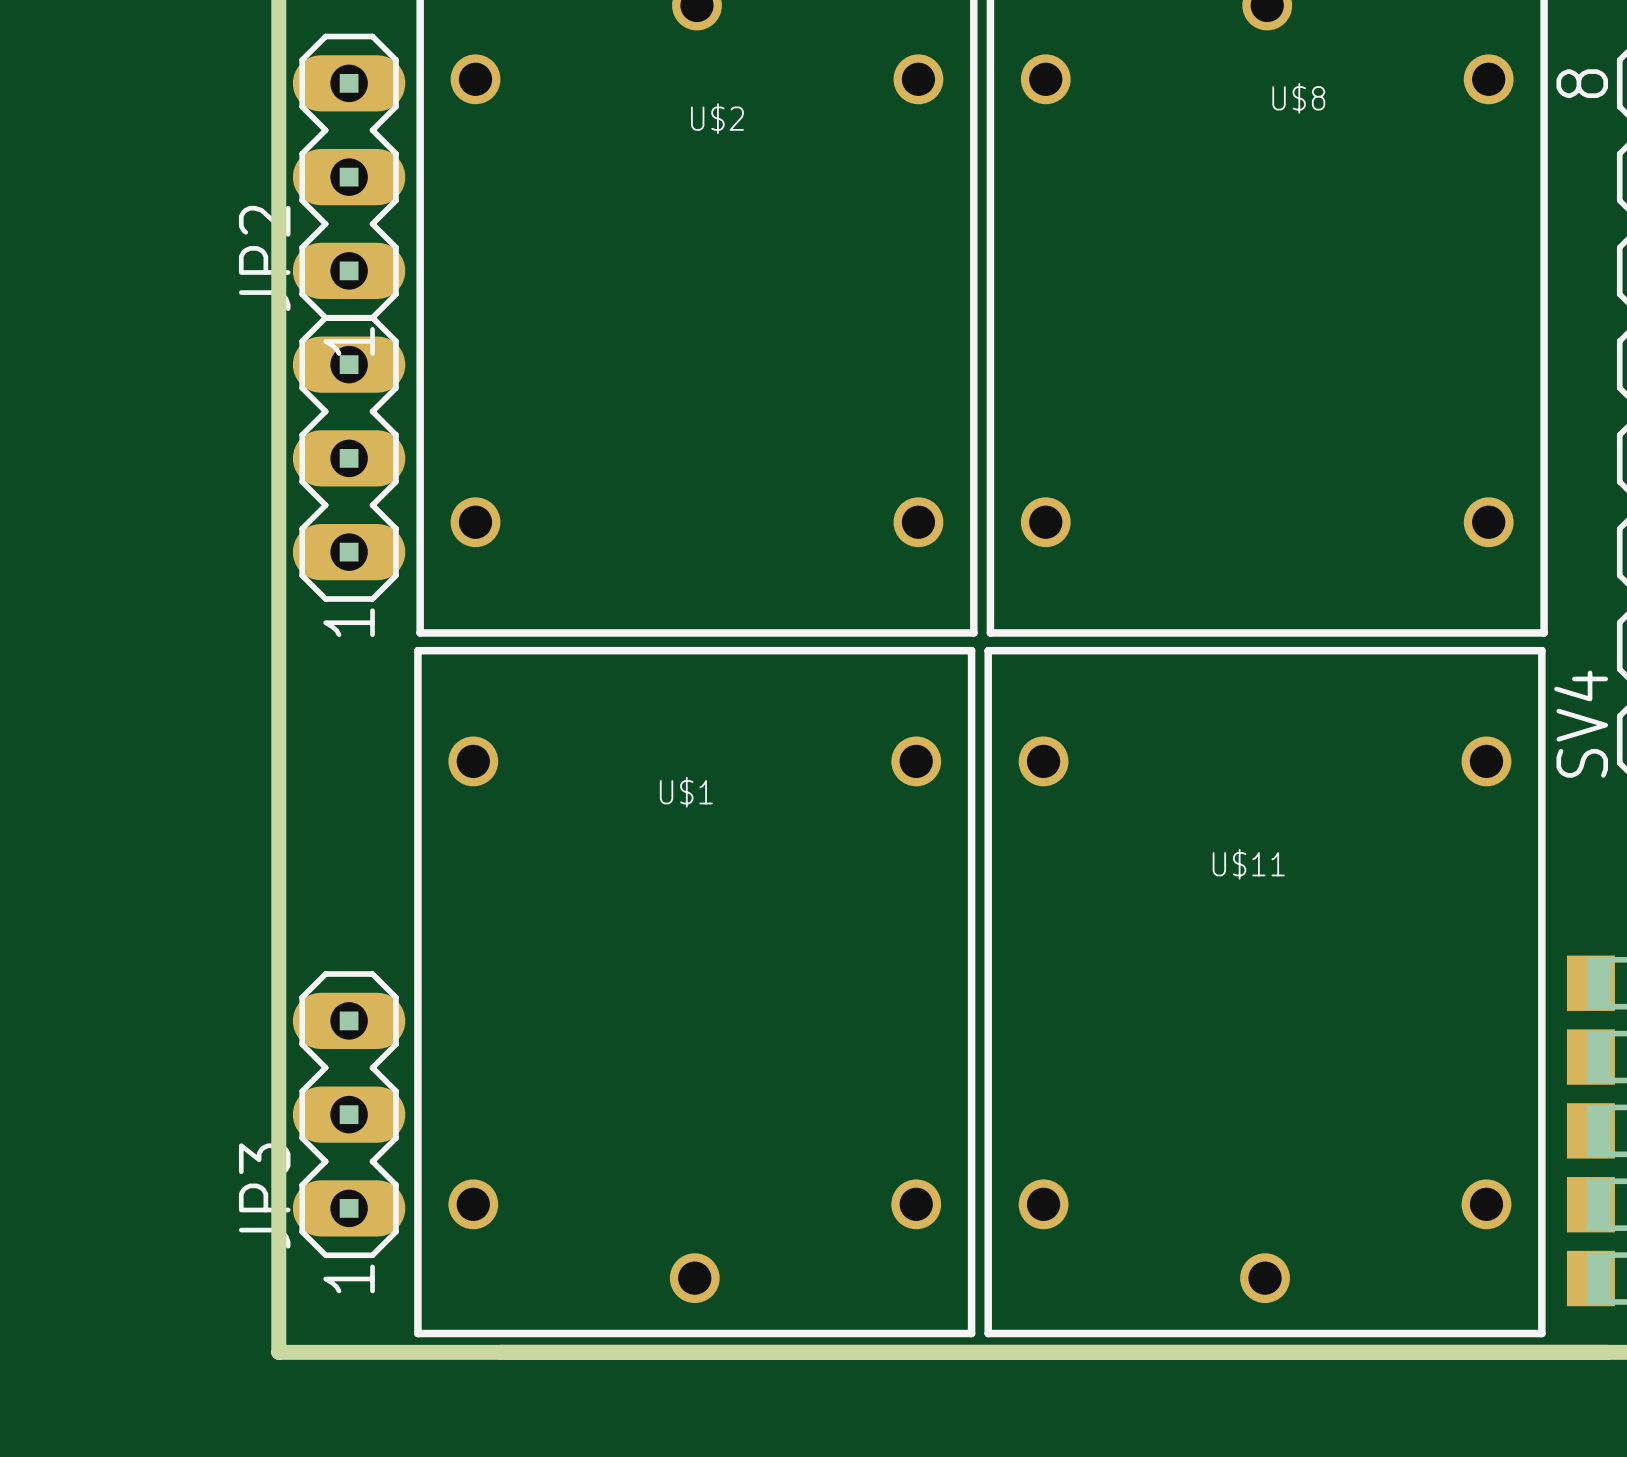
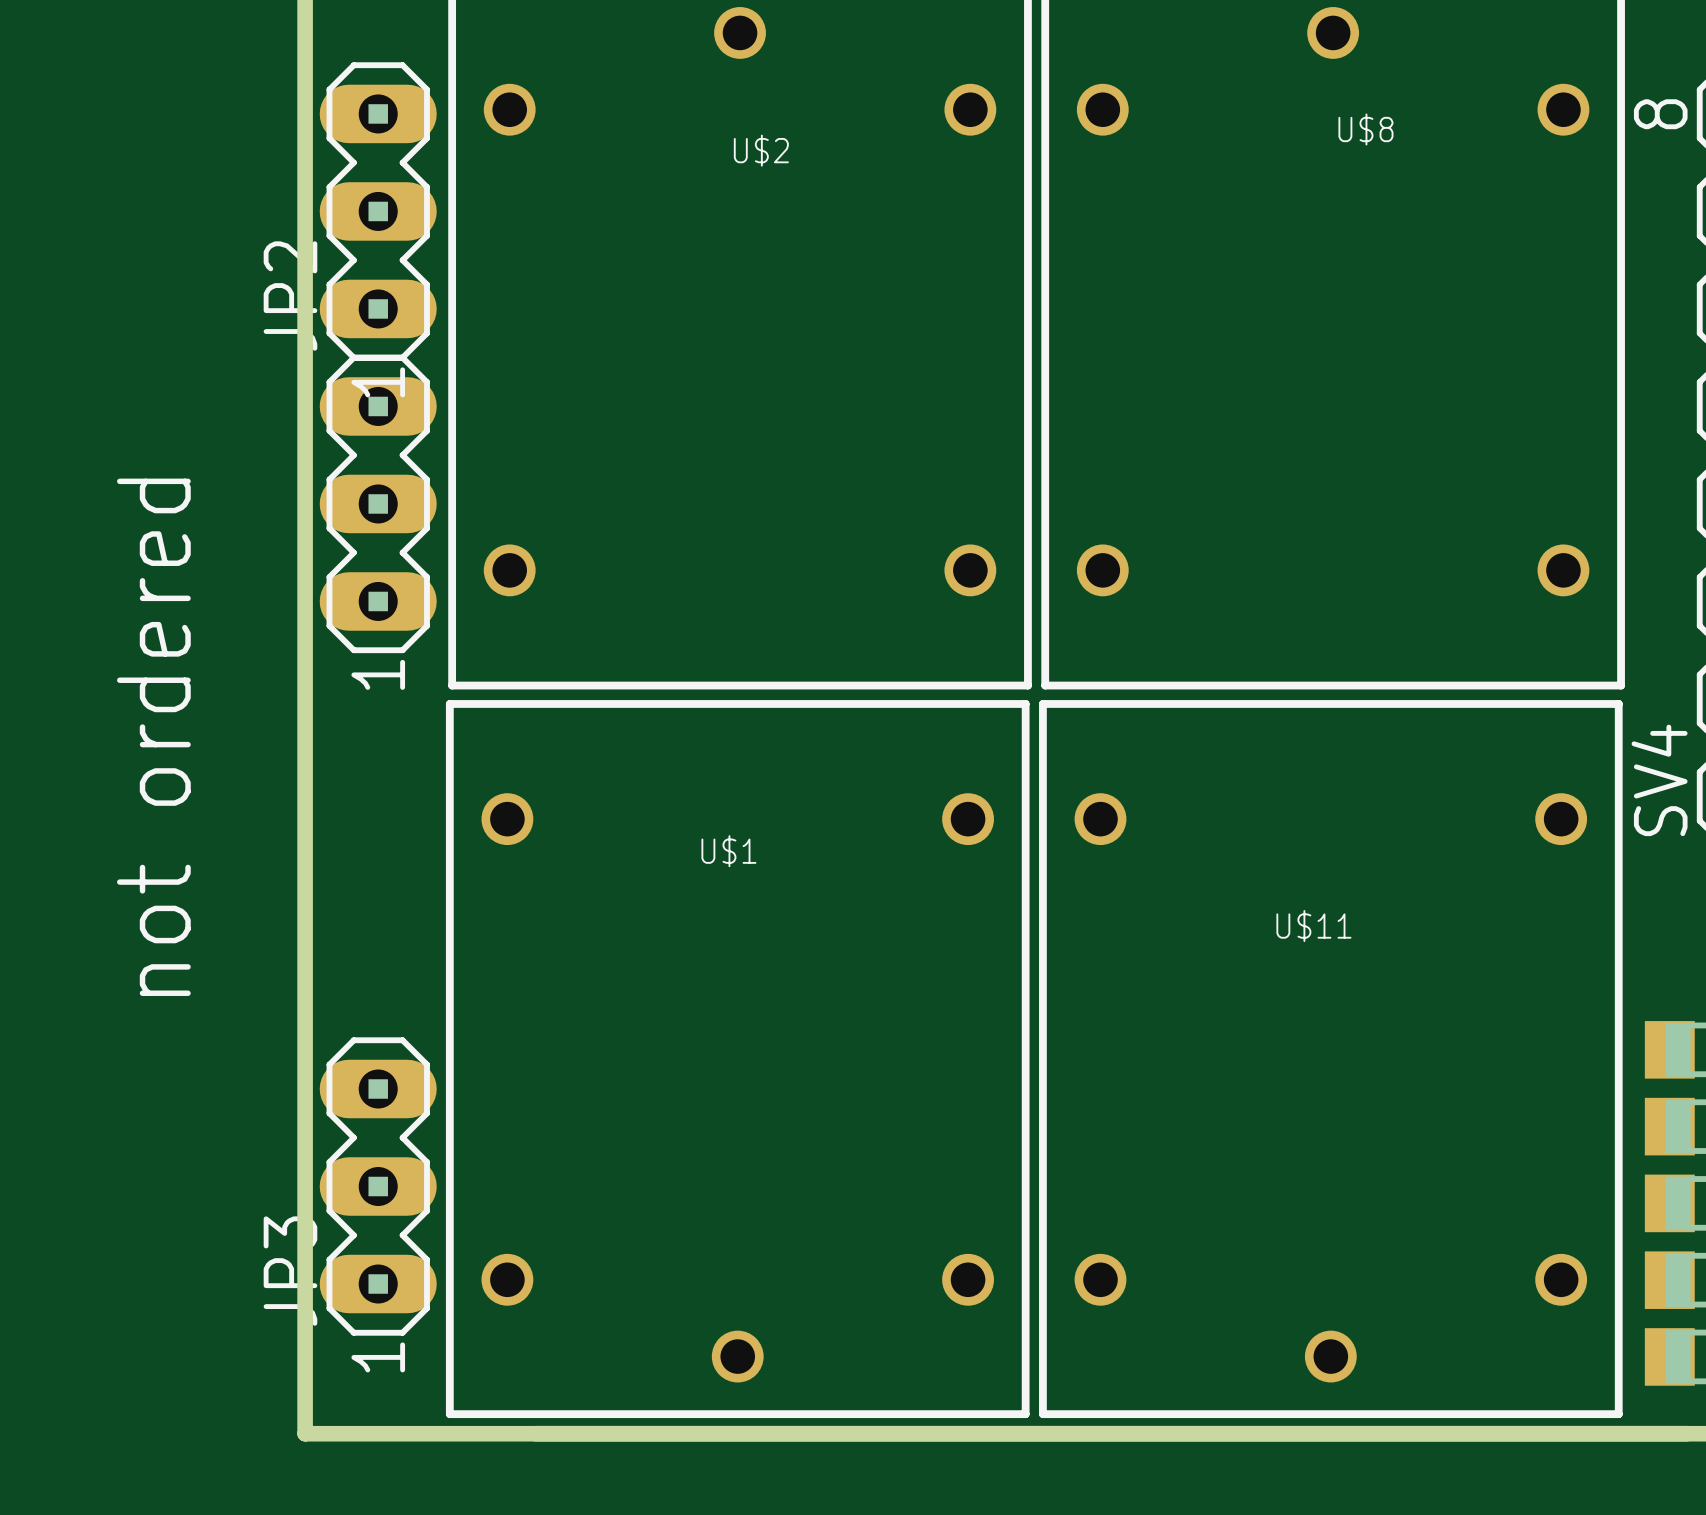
text: none -> not ordered (153, 737)

